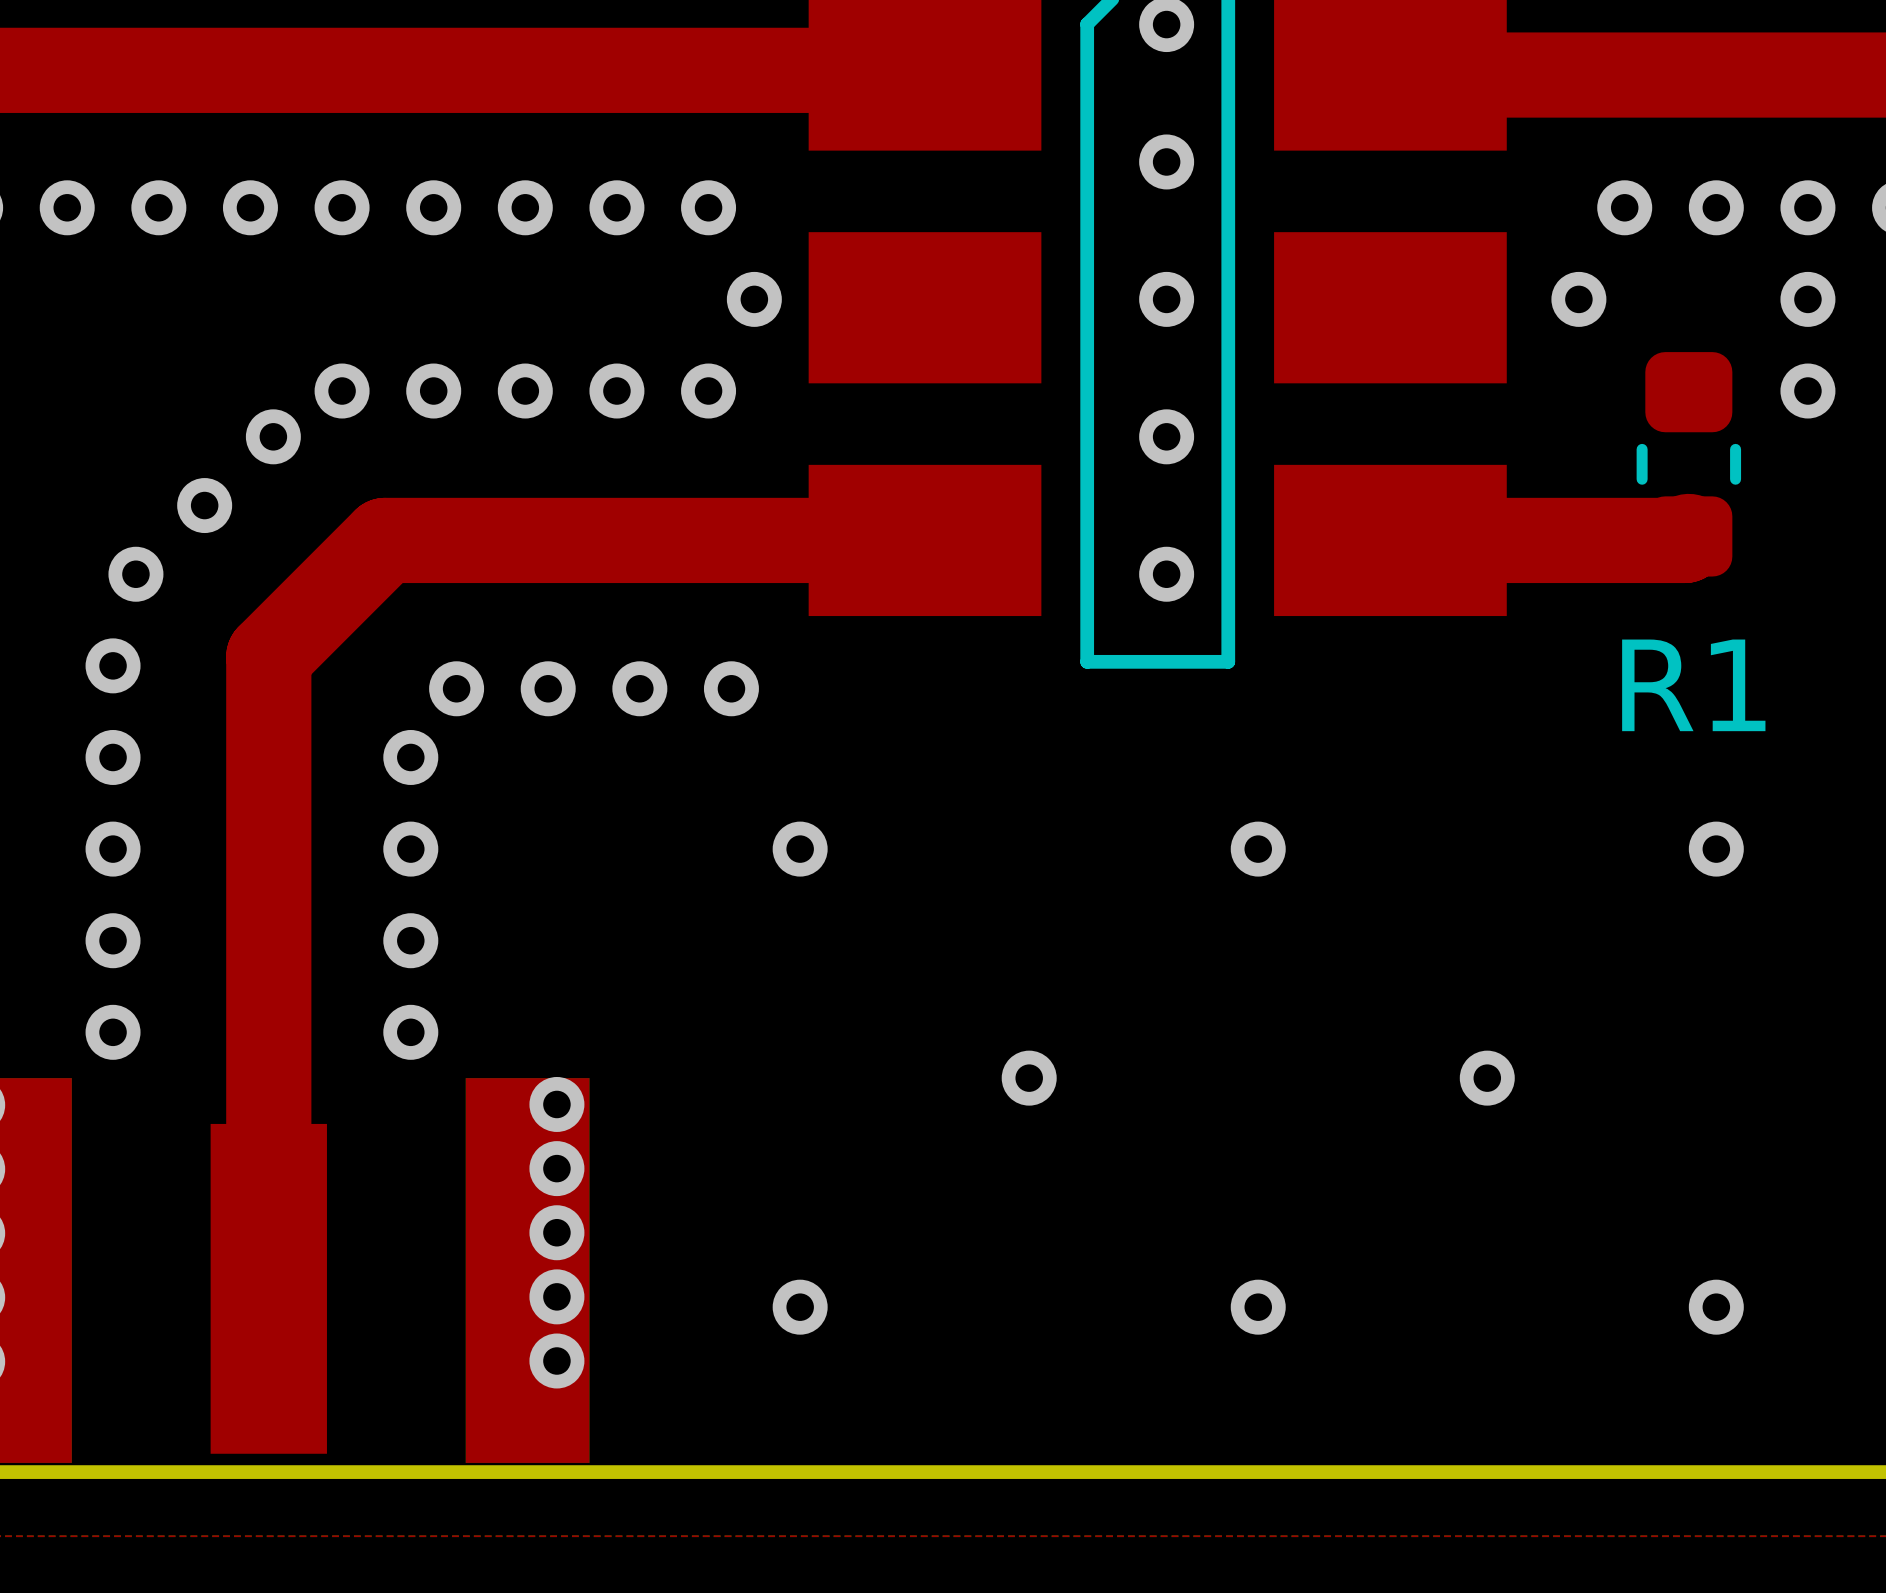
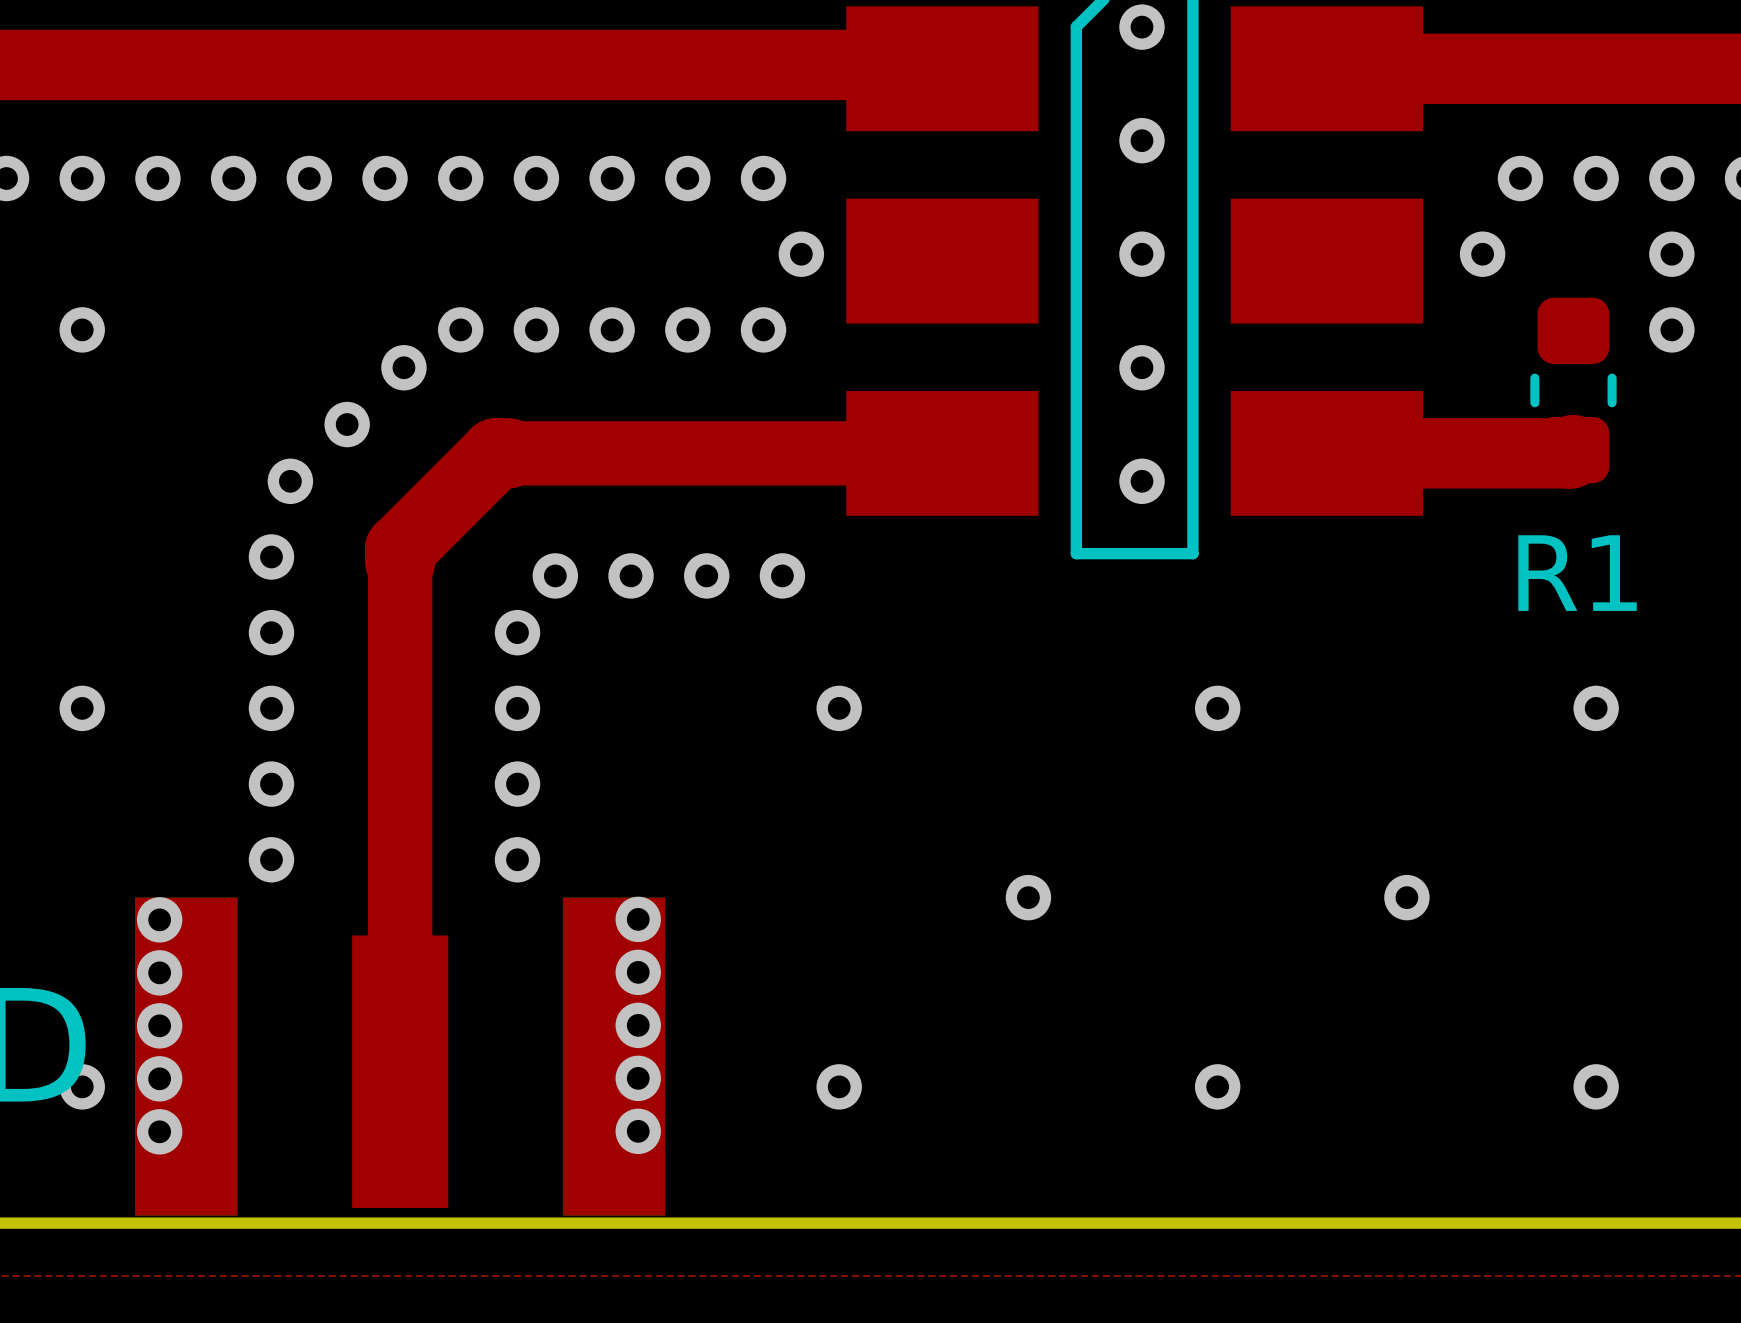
top track width: thick (399, 540) (925, 540) -> thin (508, 453) (942, 453)
top track width: thick (268, 671) (268, 1288) -> thin (400, 561) (400, 1071)

